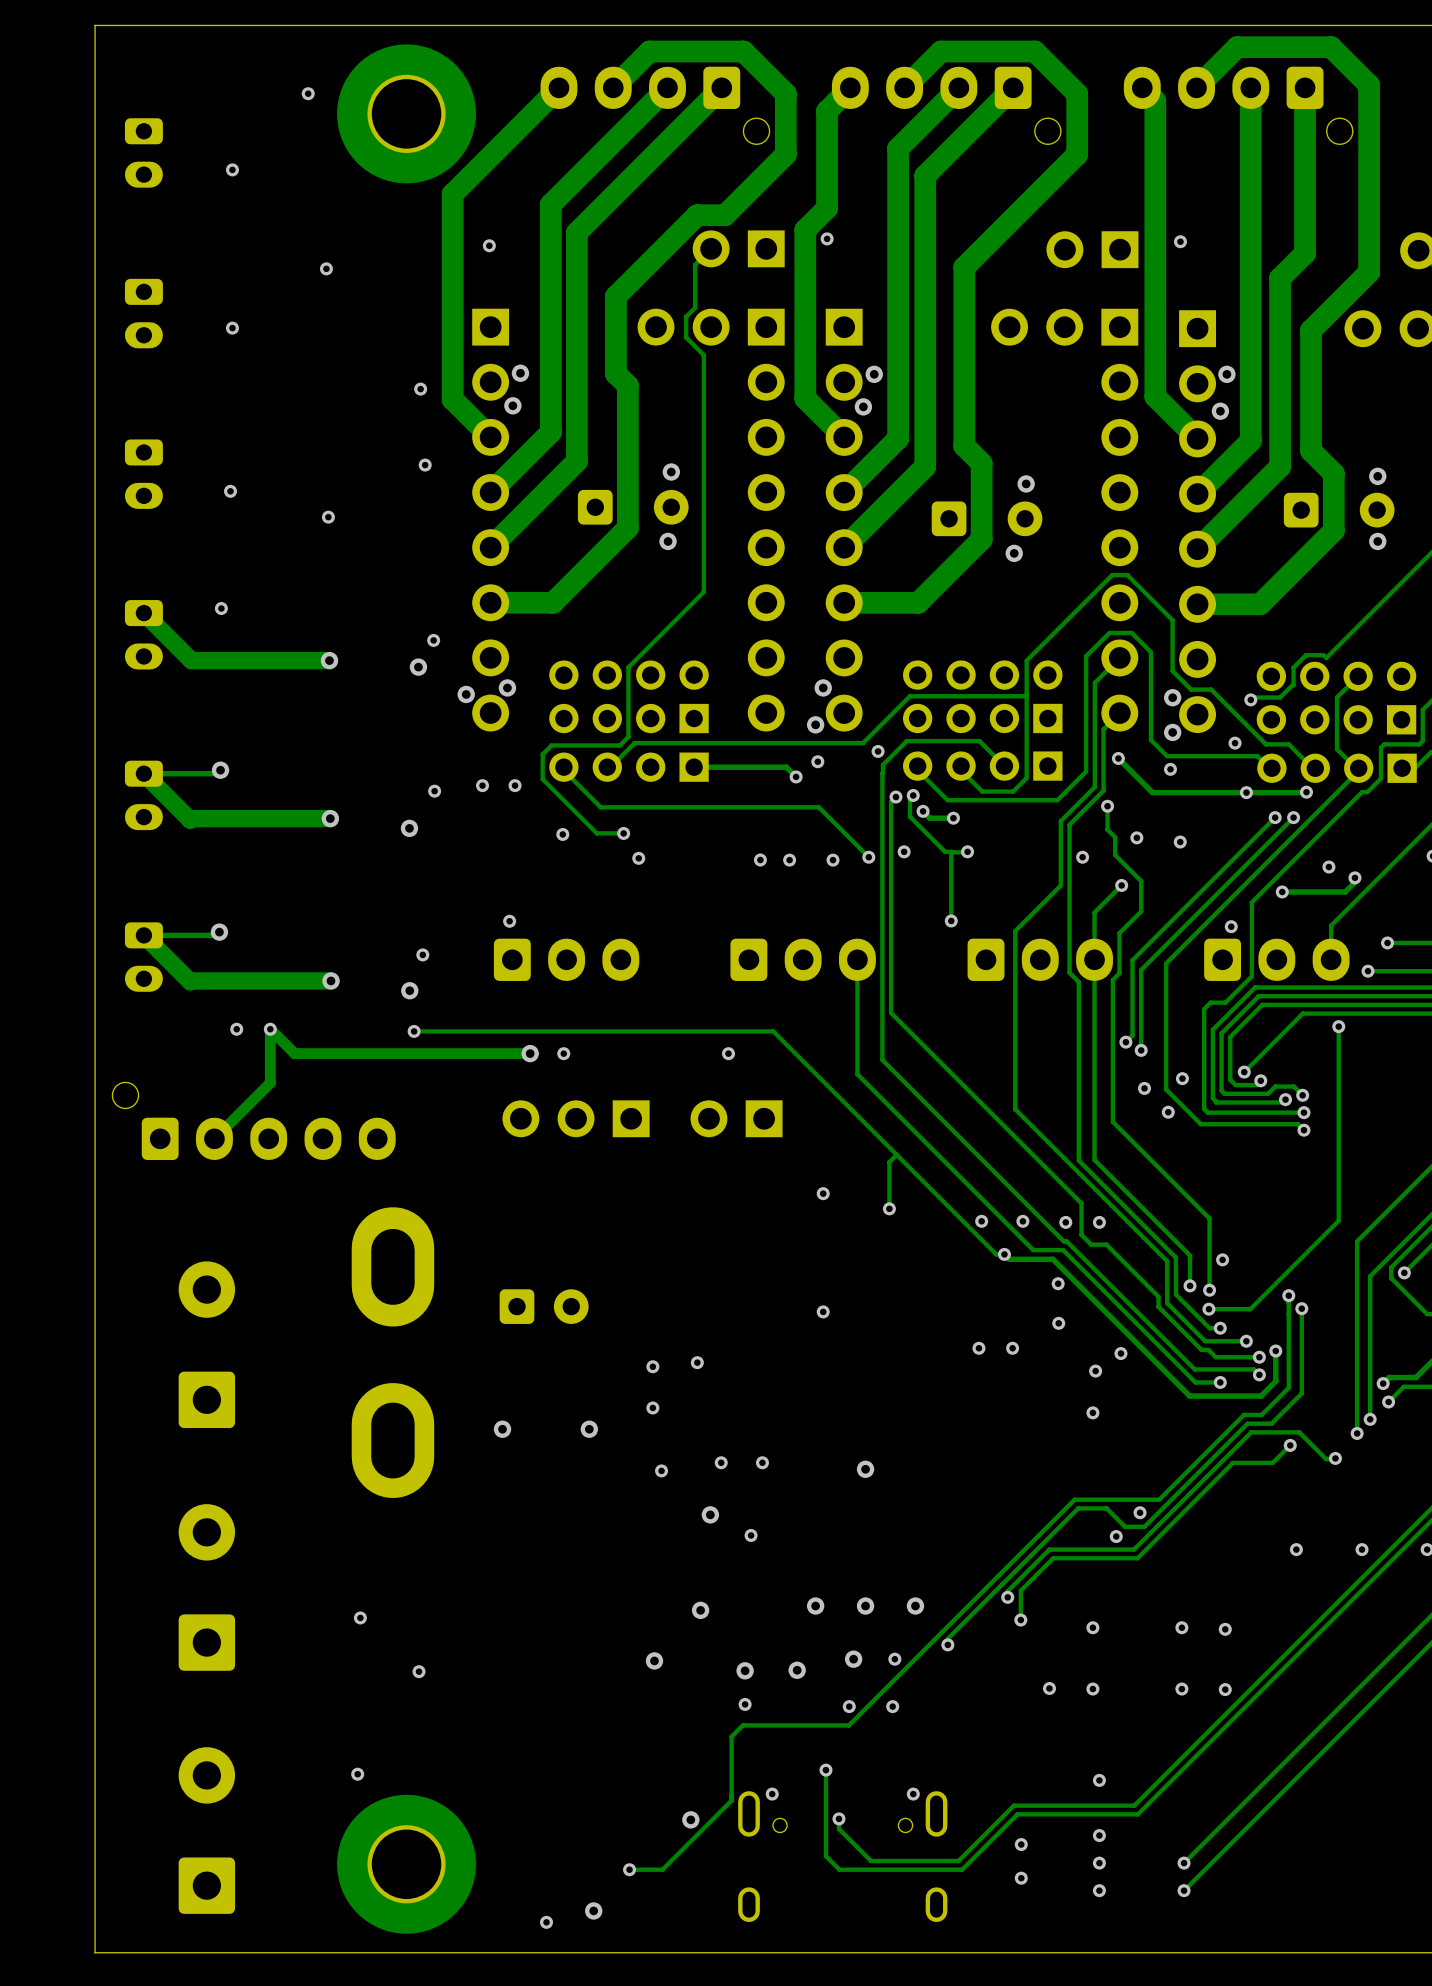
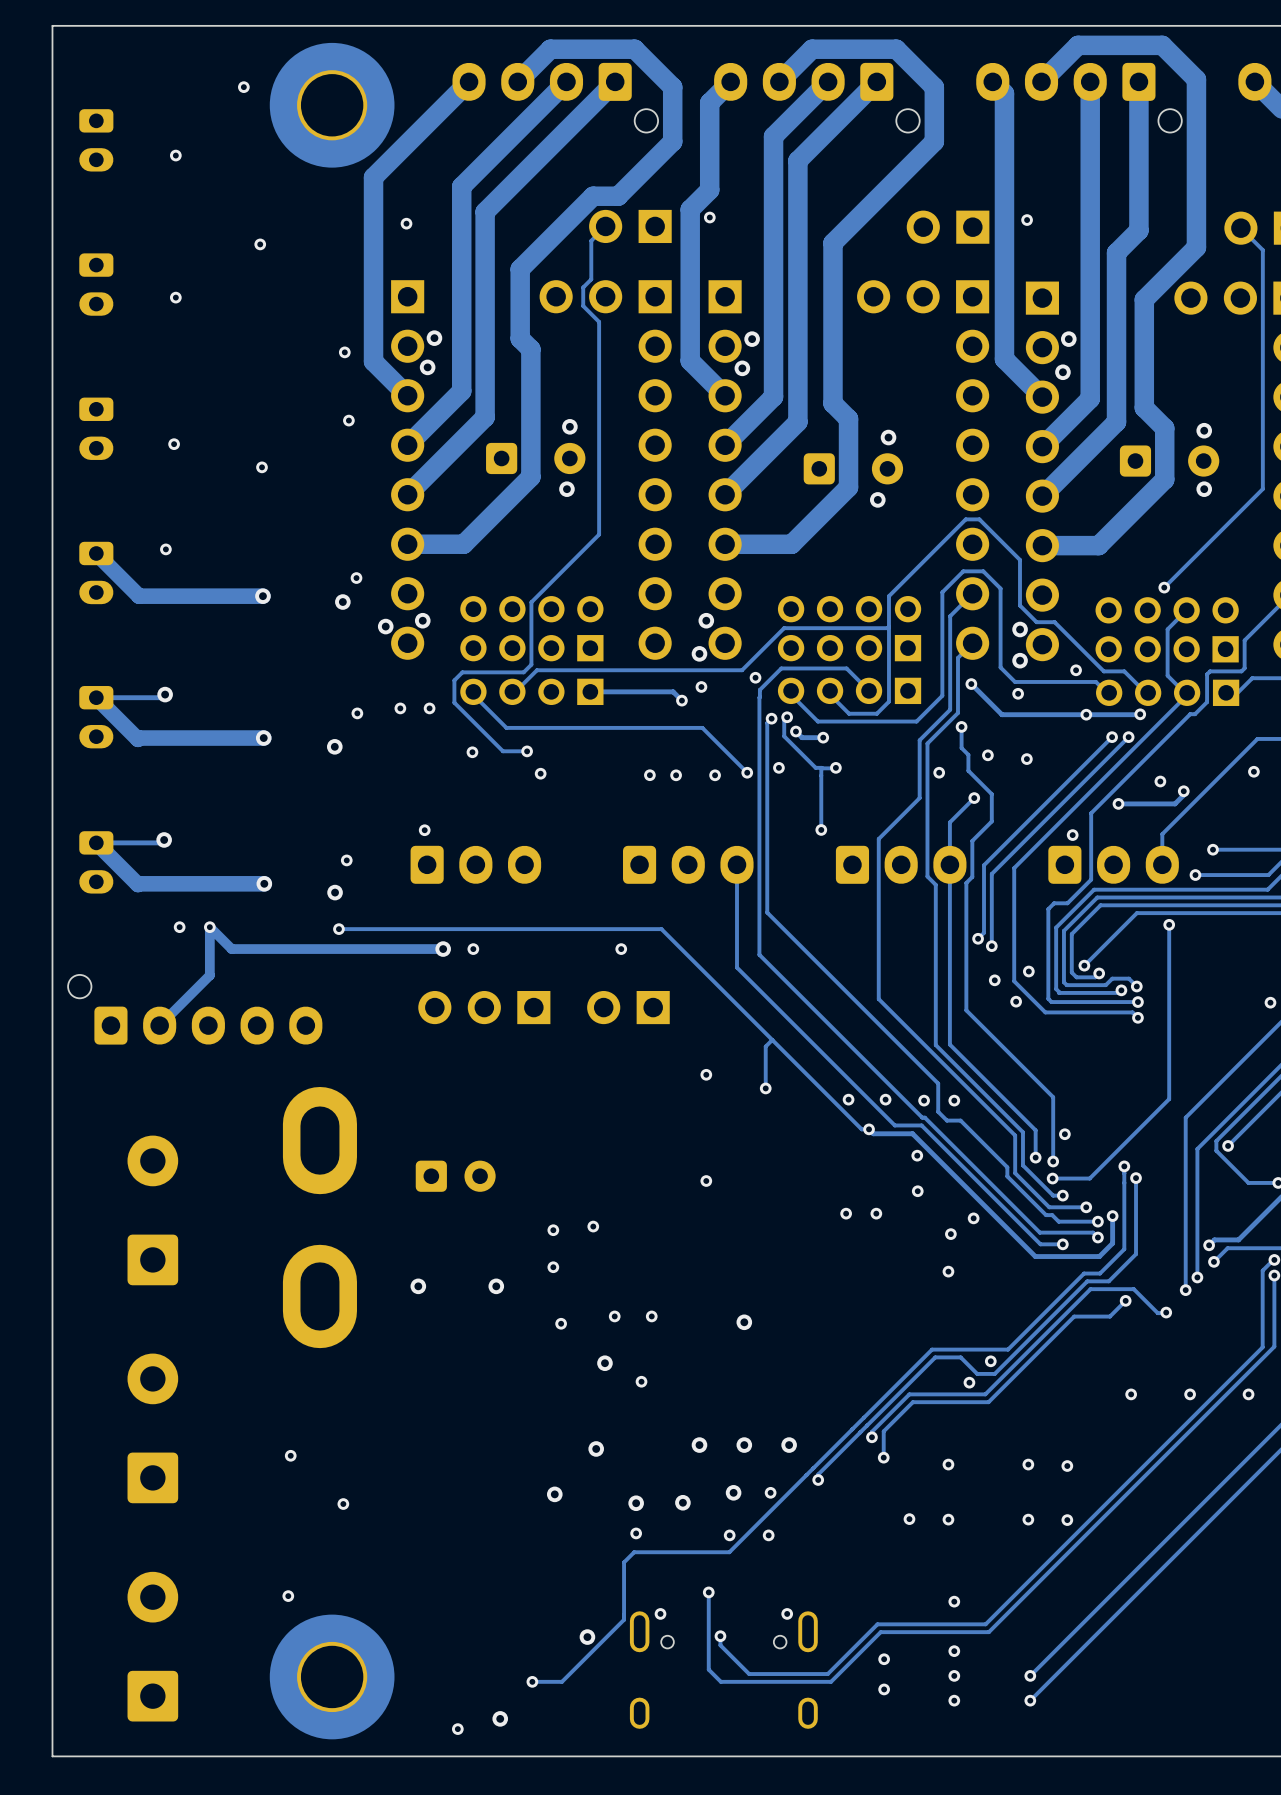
track: (1333, 651) (1326, 657) (1323, 655) (1305, 655) (1293, 667) (1293, 685) (1280, 697) (1253, 697) (1250, 699) -> none
via position: (1250, 699) -> (1164, 587)

